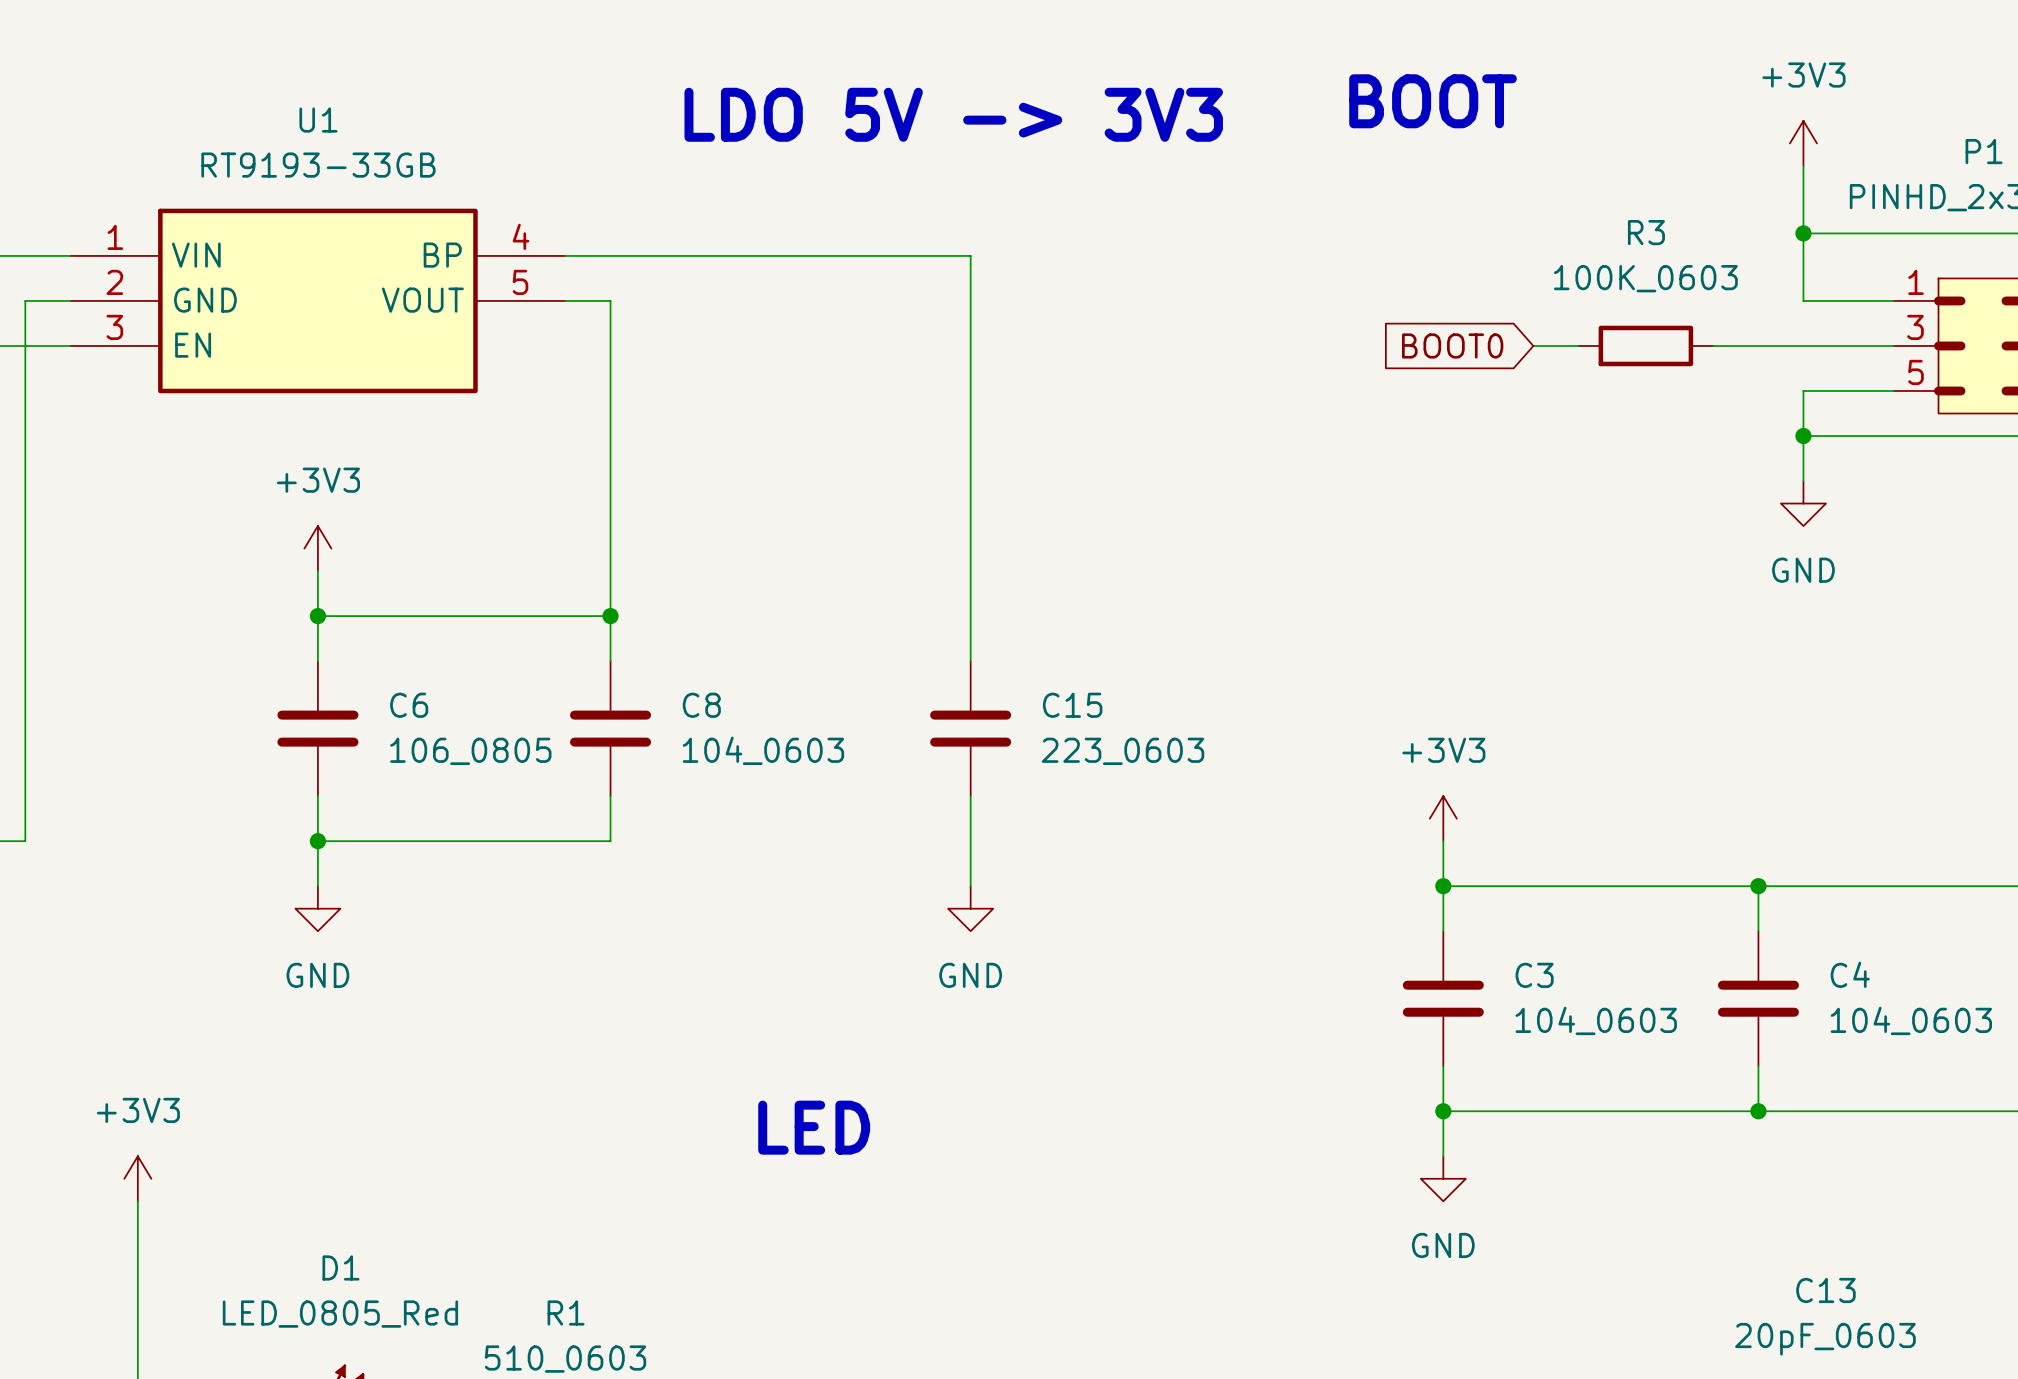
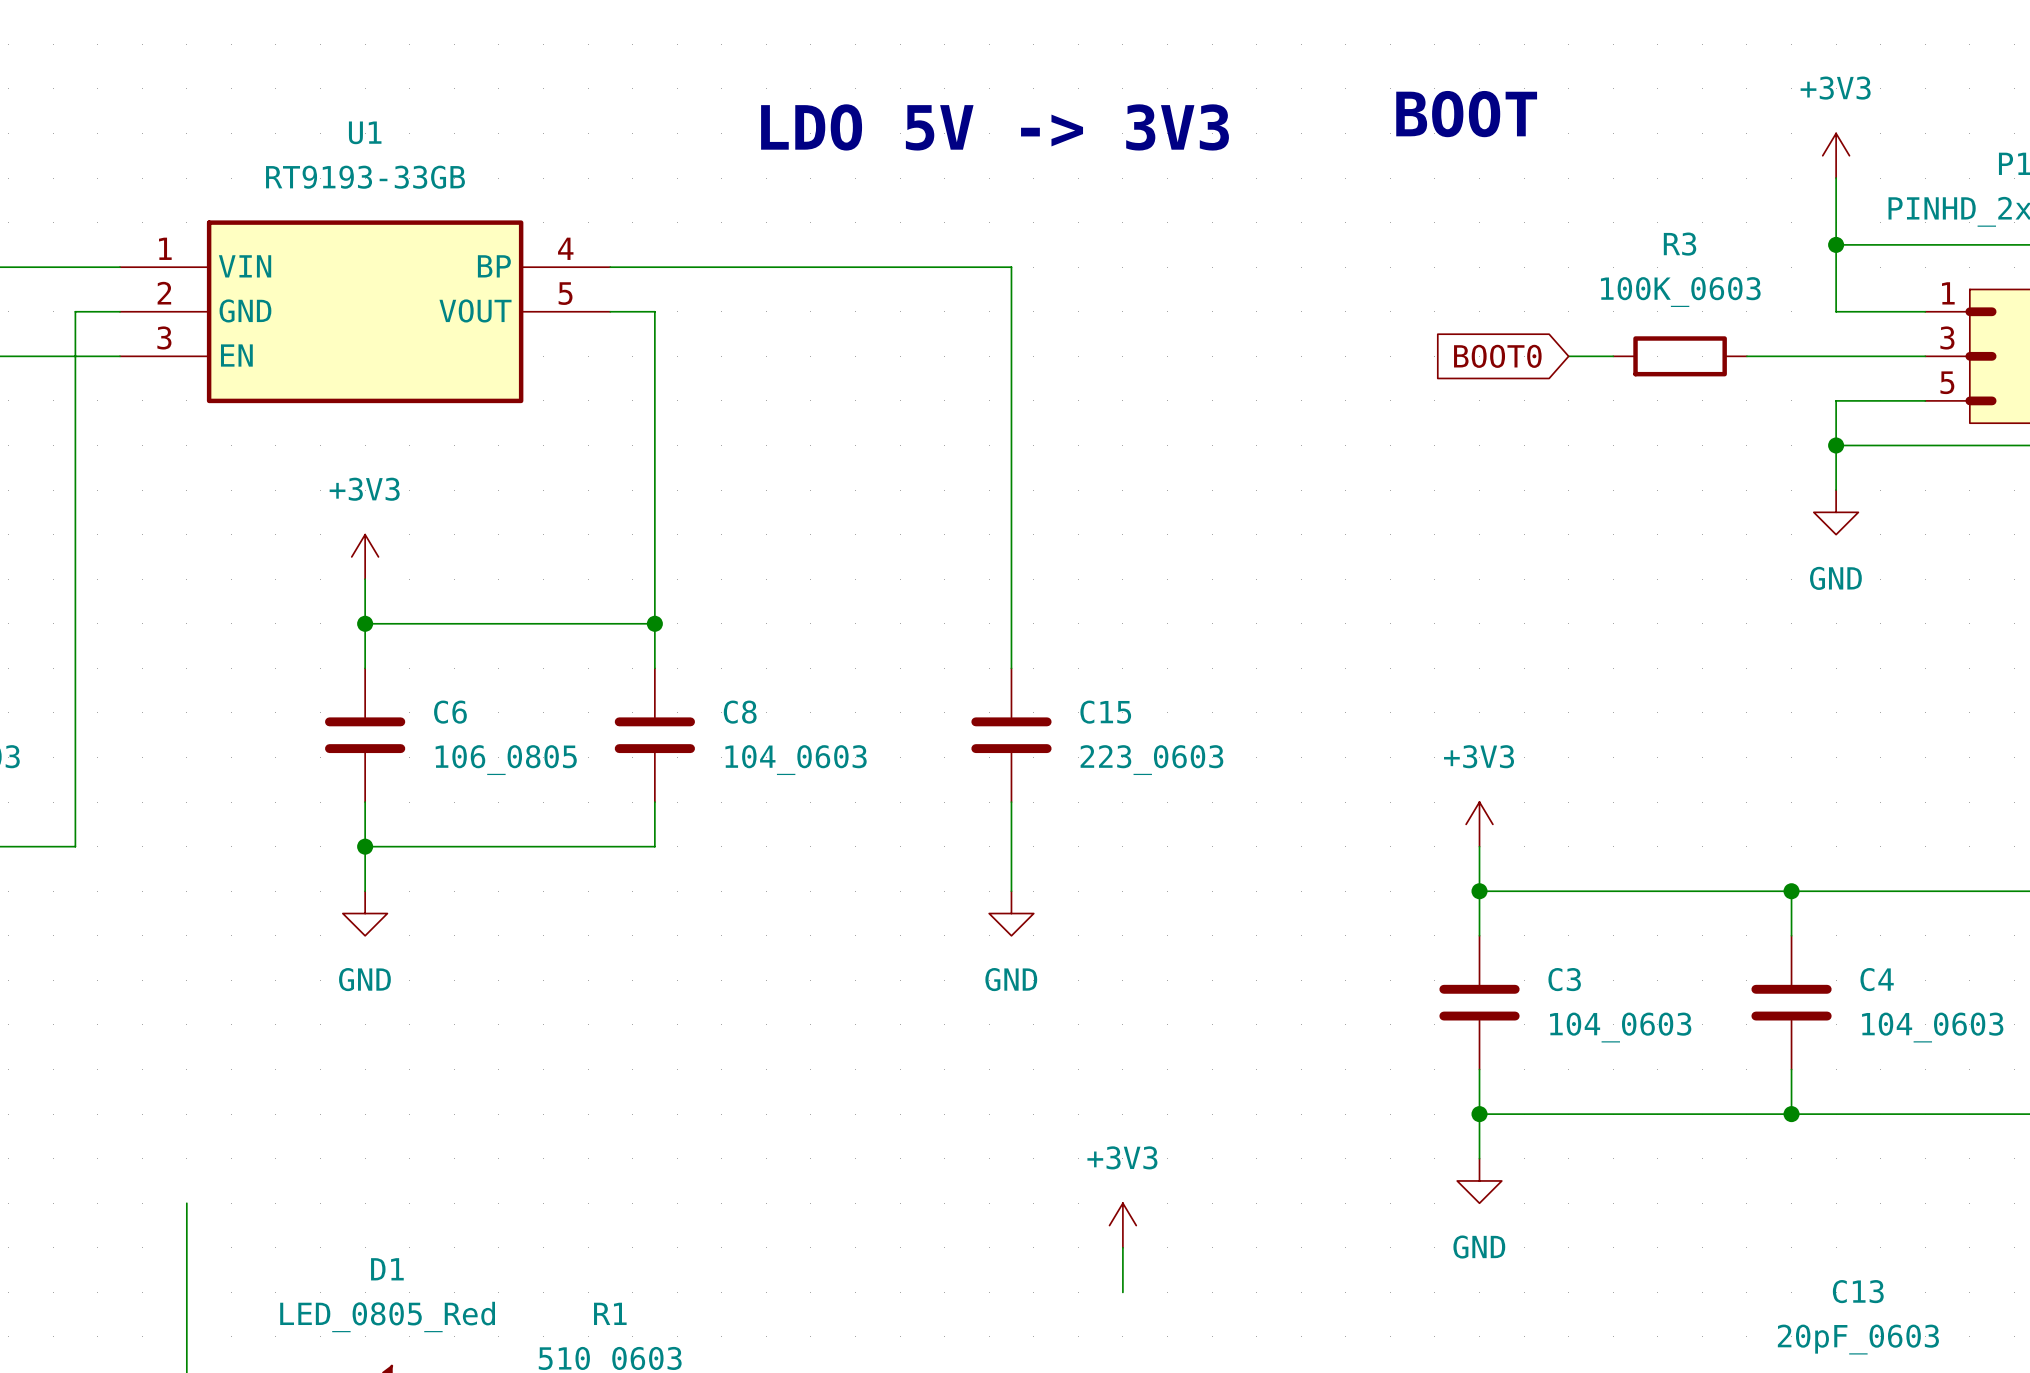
text: LED (814, 1127) -> none
power symbol: +3V3 (137, 1178) -> none
power symbol: none -> +3V3 (1122, 1225)
wire: none -> (1122, 1247) (1122, 1292)

